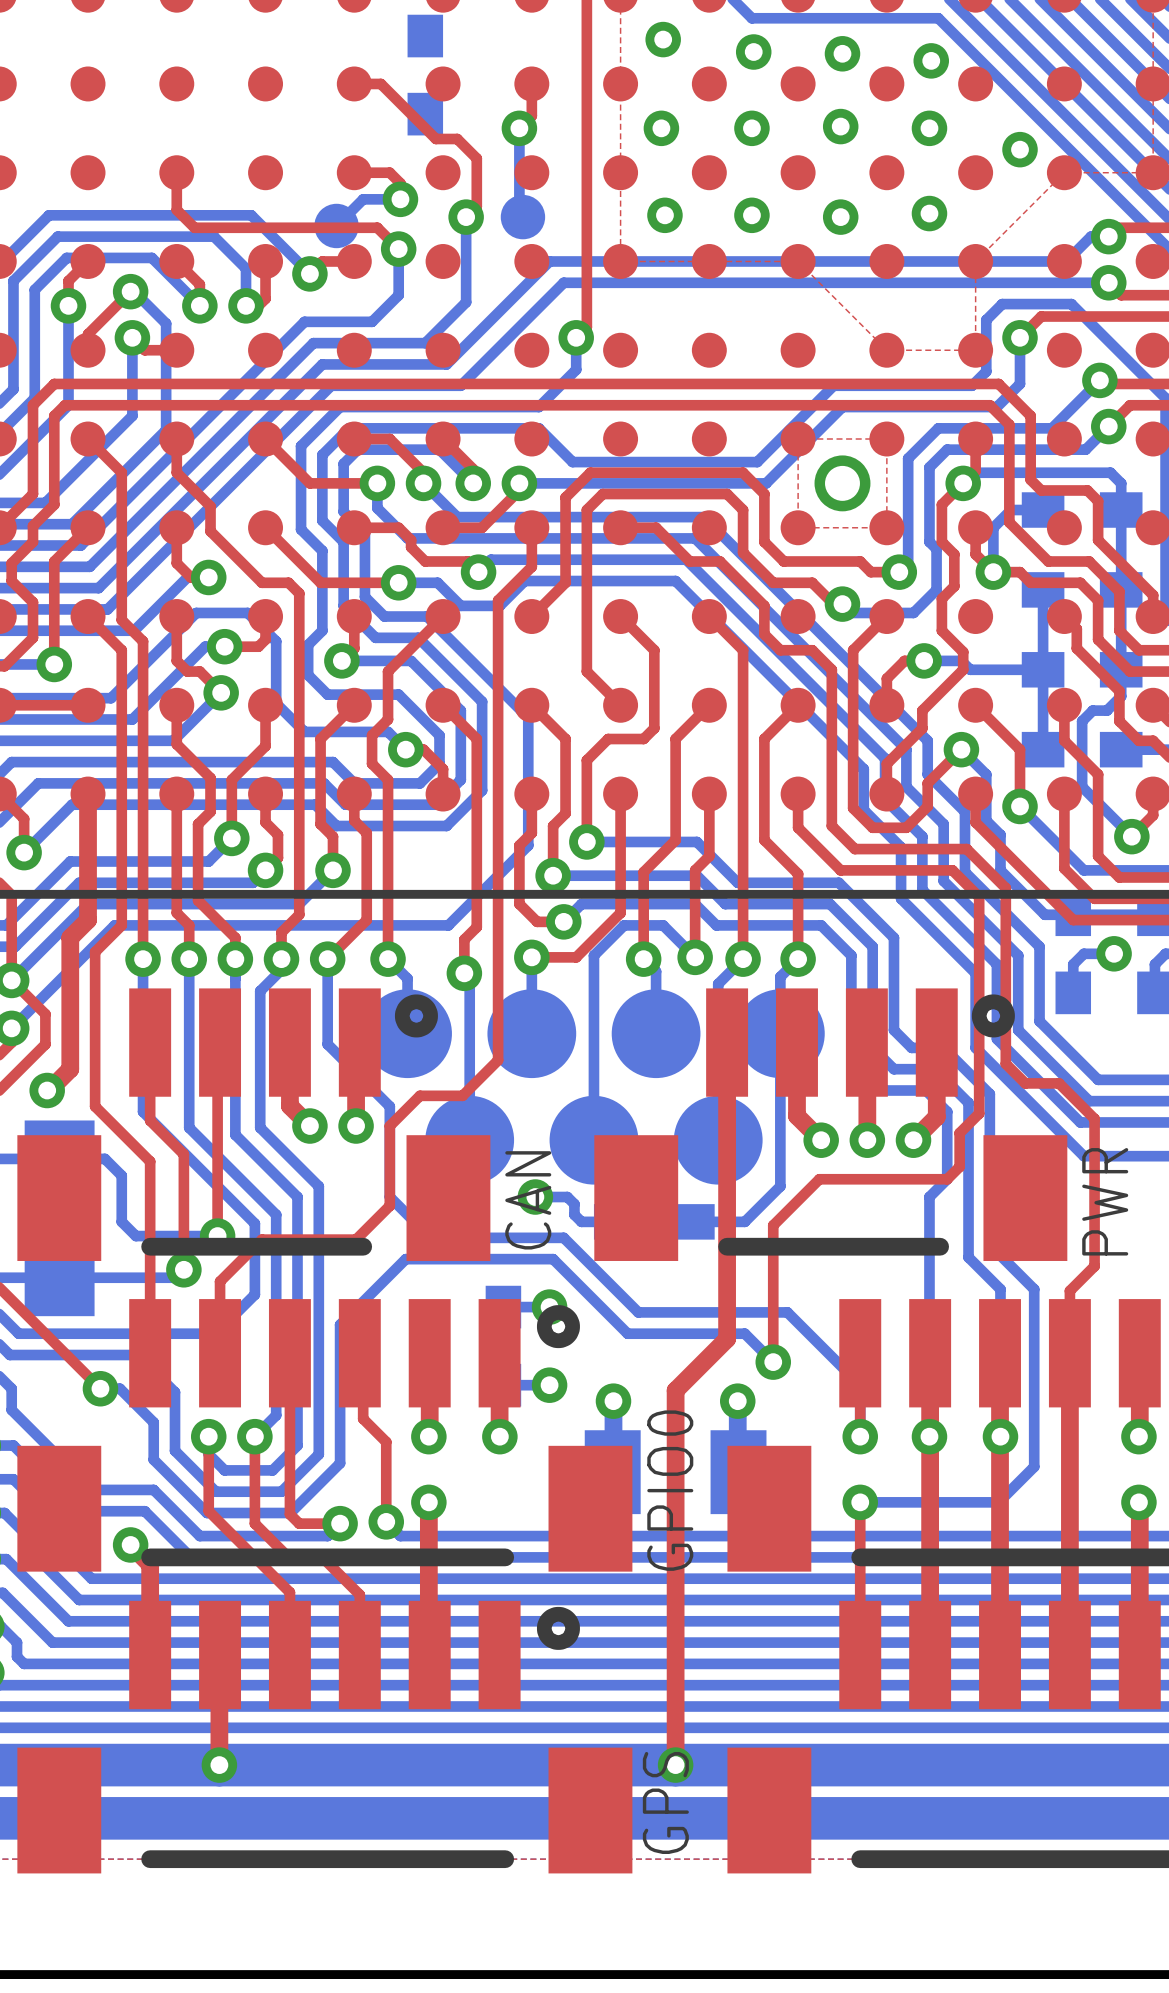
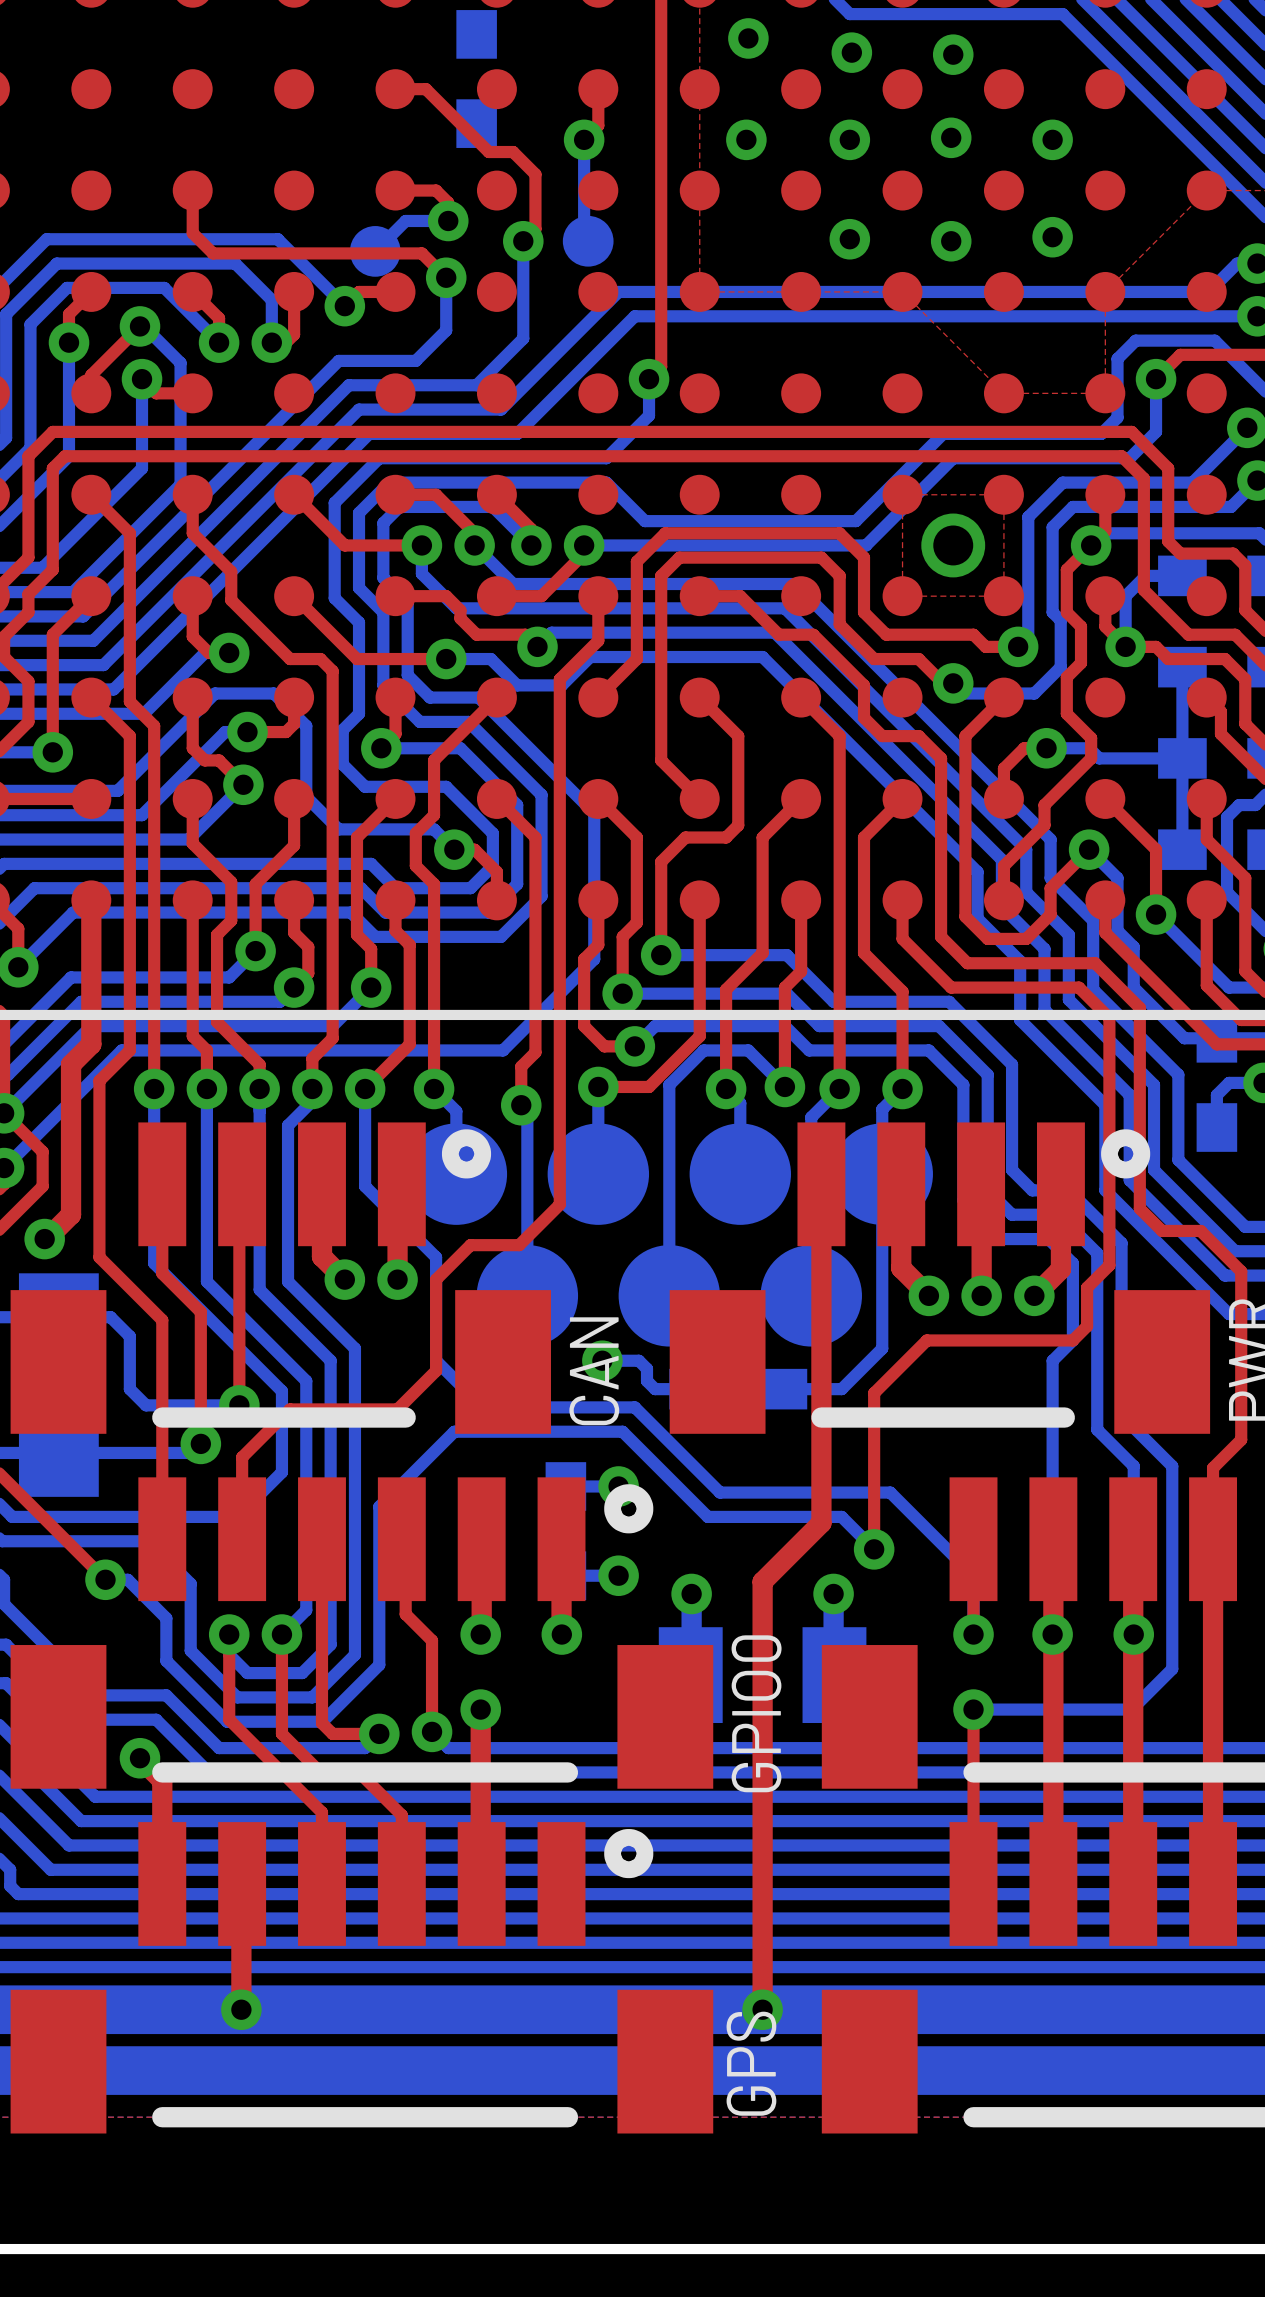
via: (931, 60) -> none
via: (1020, 149) -> none
via: (664, 215) -> none

